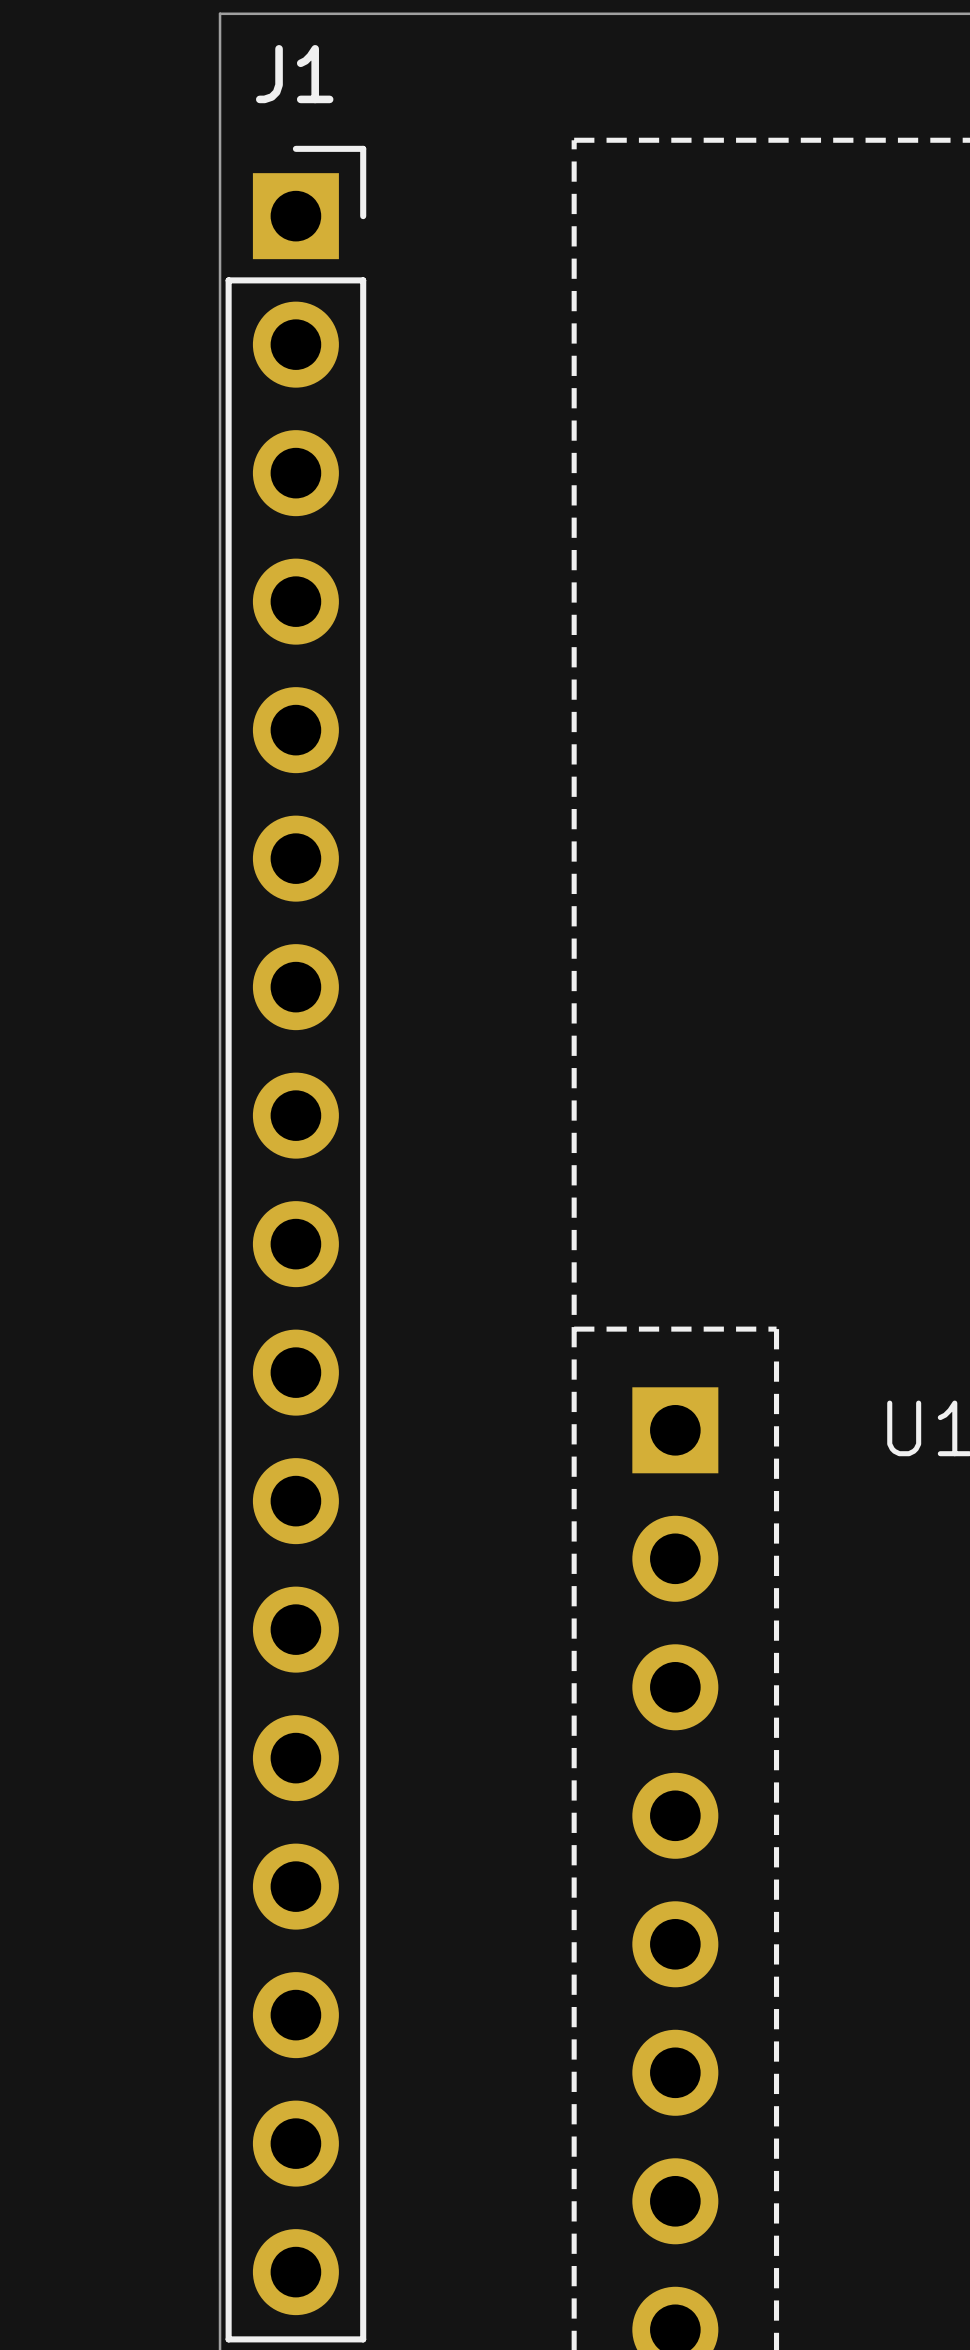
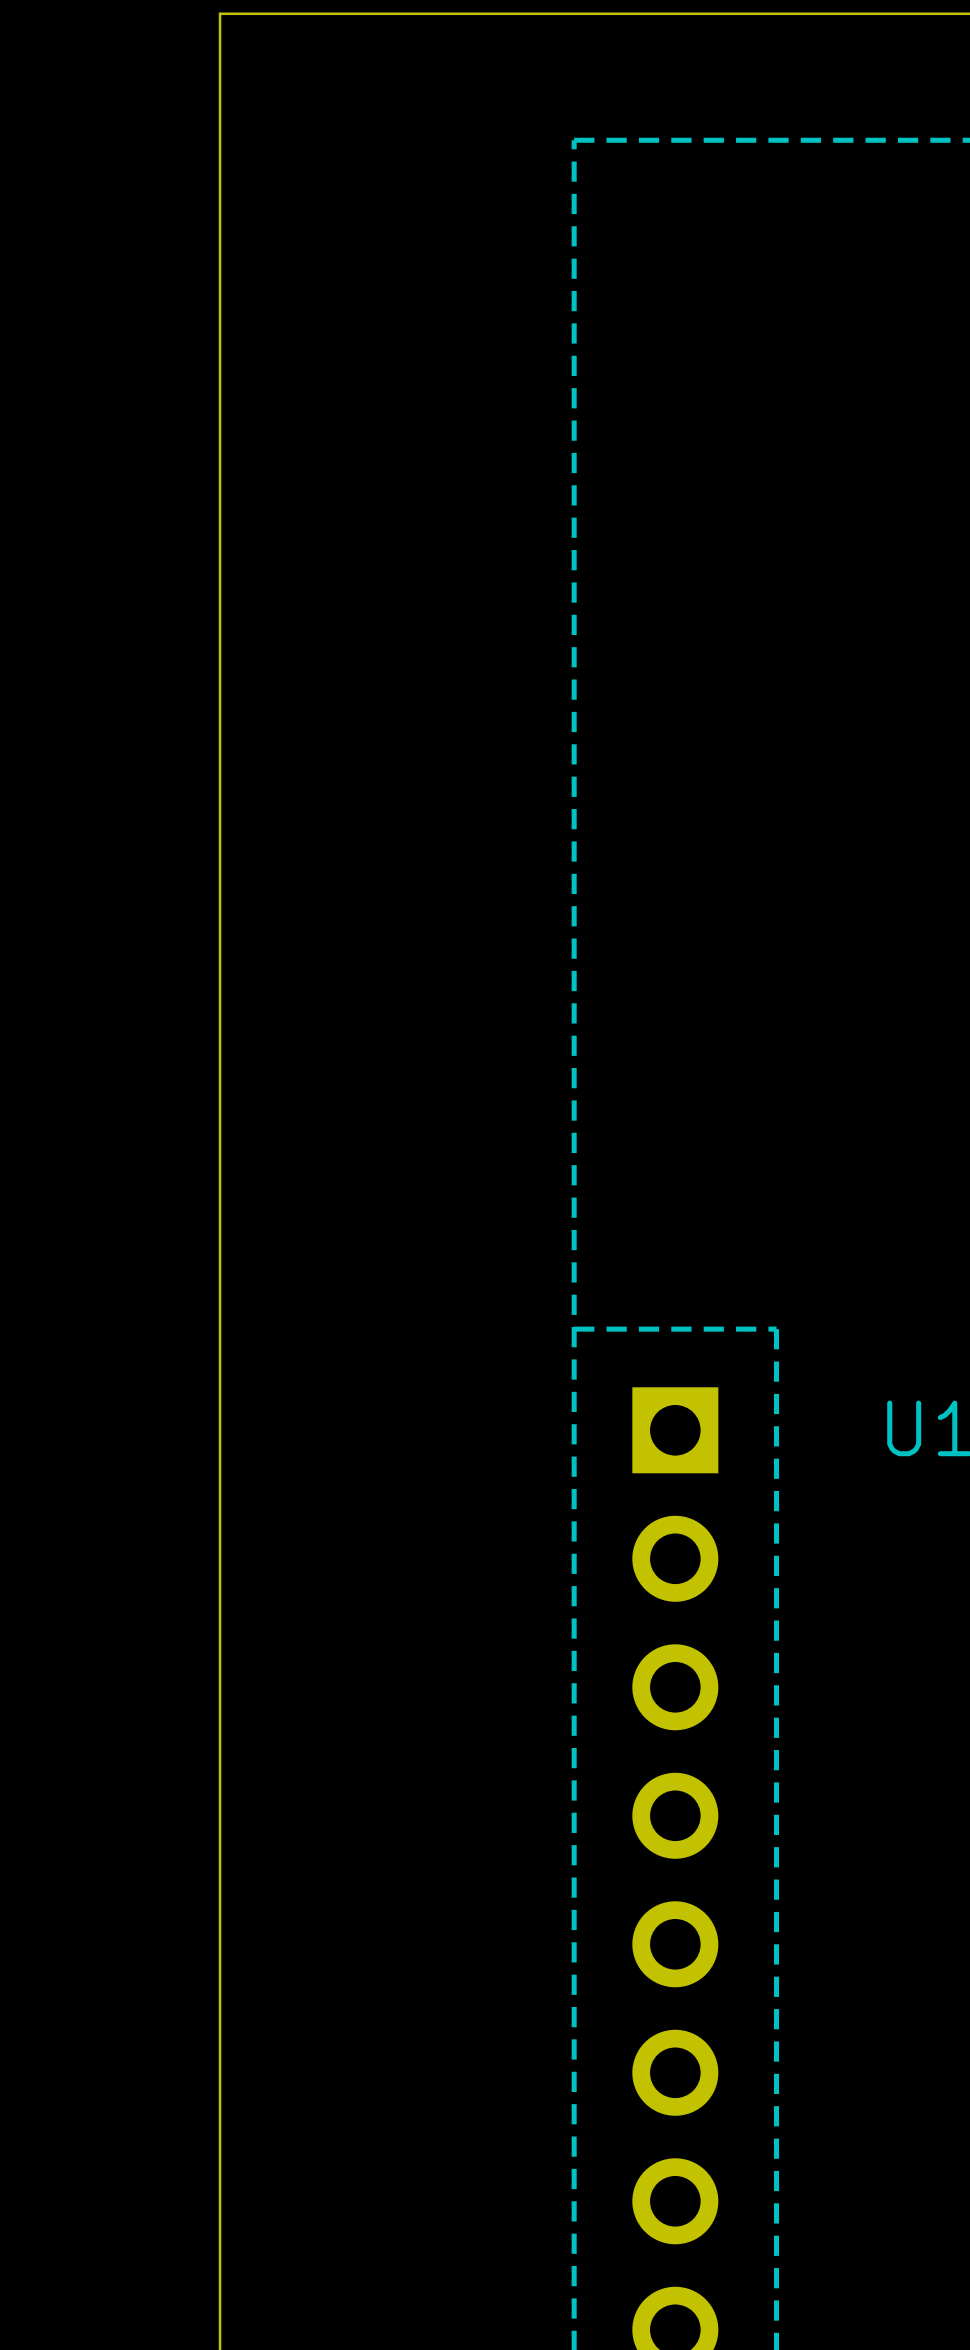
J1: (295, 1244) -> none

